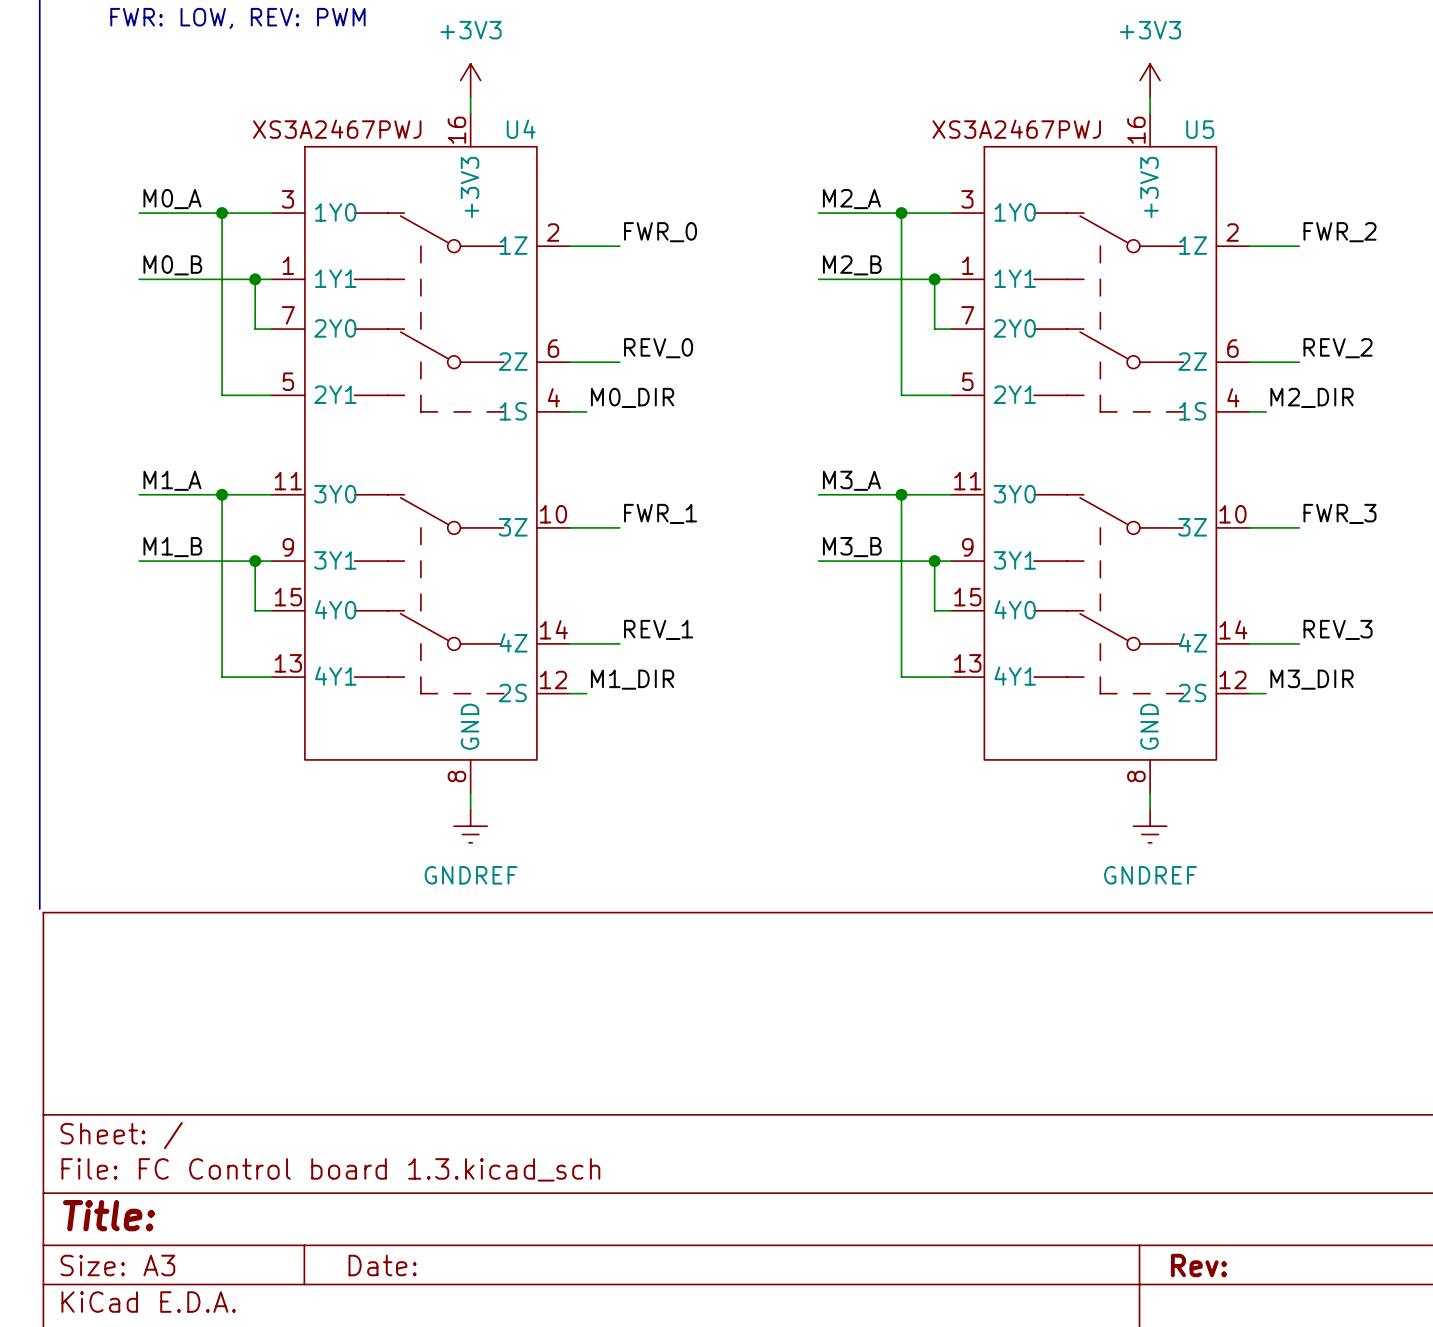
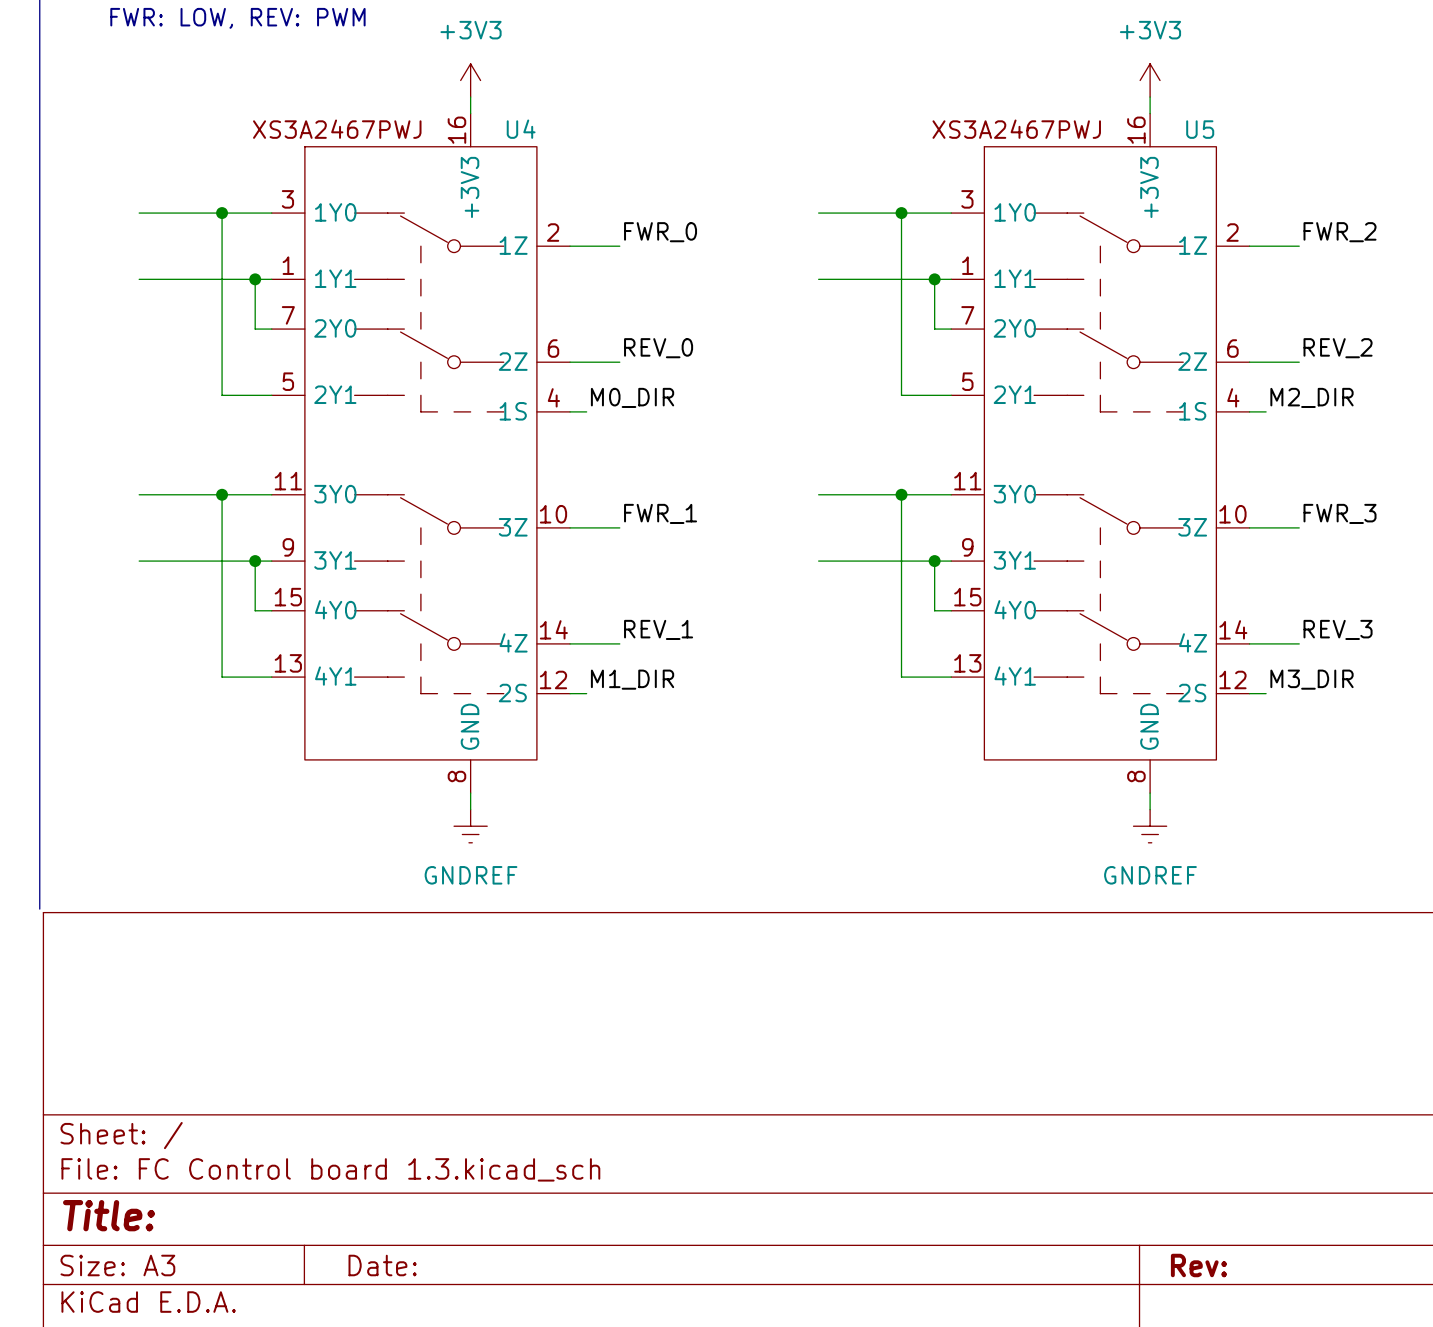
label: M0_A (172, 199) -> none
label: M2_A (851, 199) -> none
label: M0_B (172, 265) -> none
label: M2_B (852, 265) -> none
label: M1_A (172, 480) -> none
label: M3_A (851, 480) -> none
label: M1_B (172, 547) -> none
label: M3_B (852, 547) -> none

